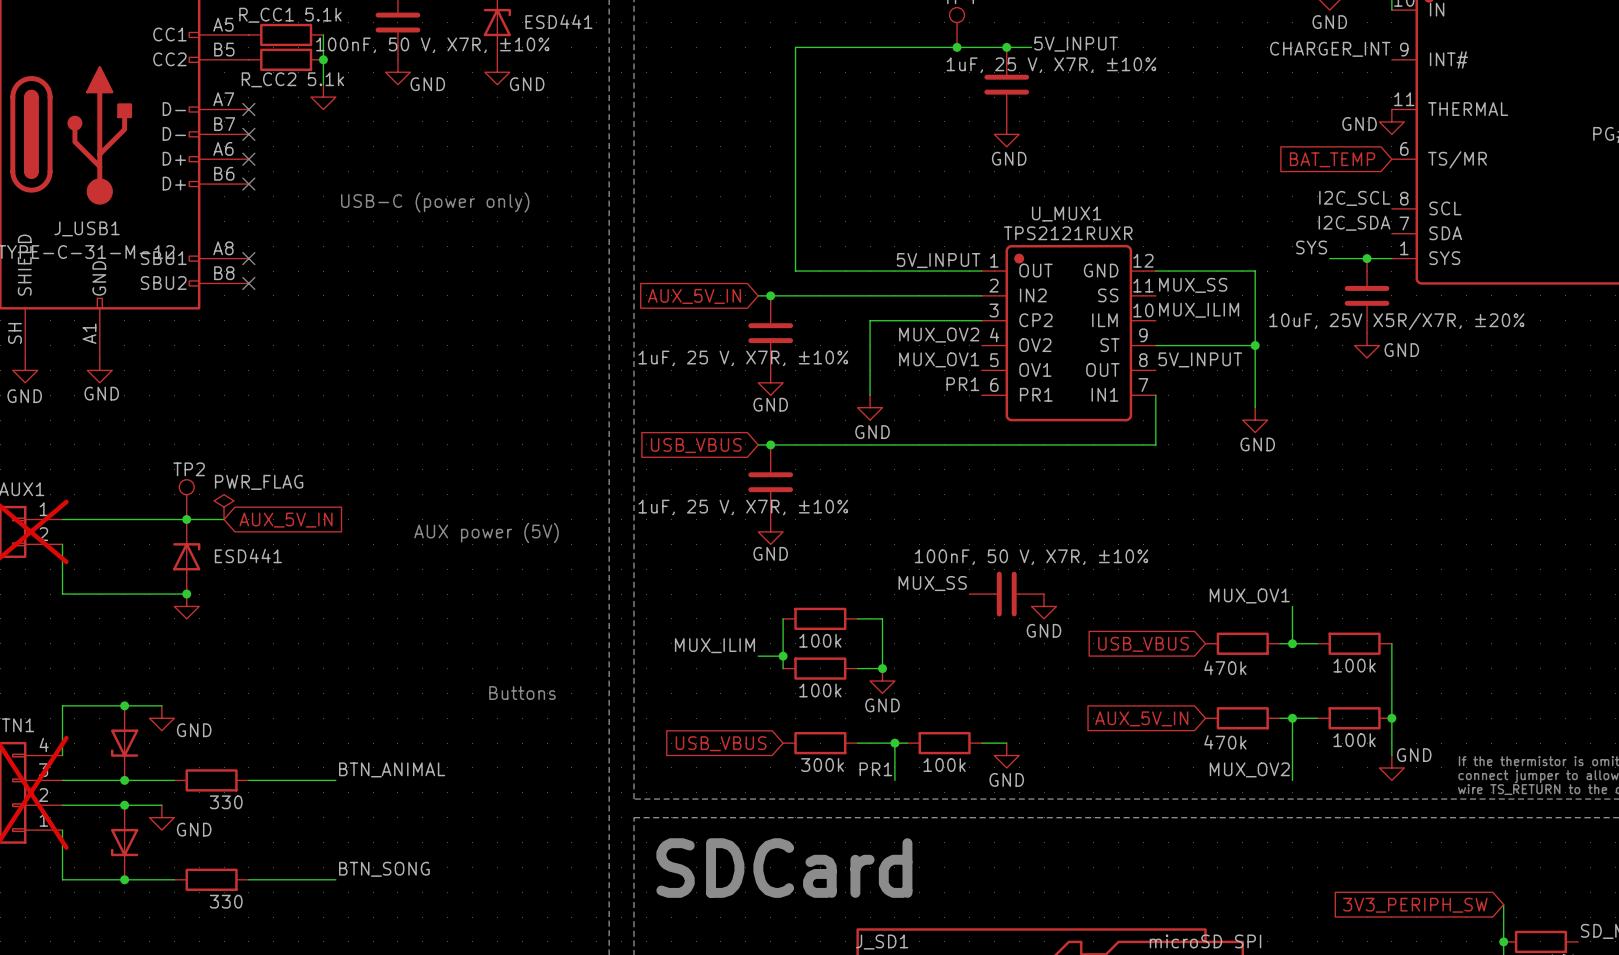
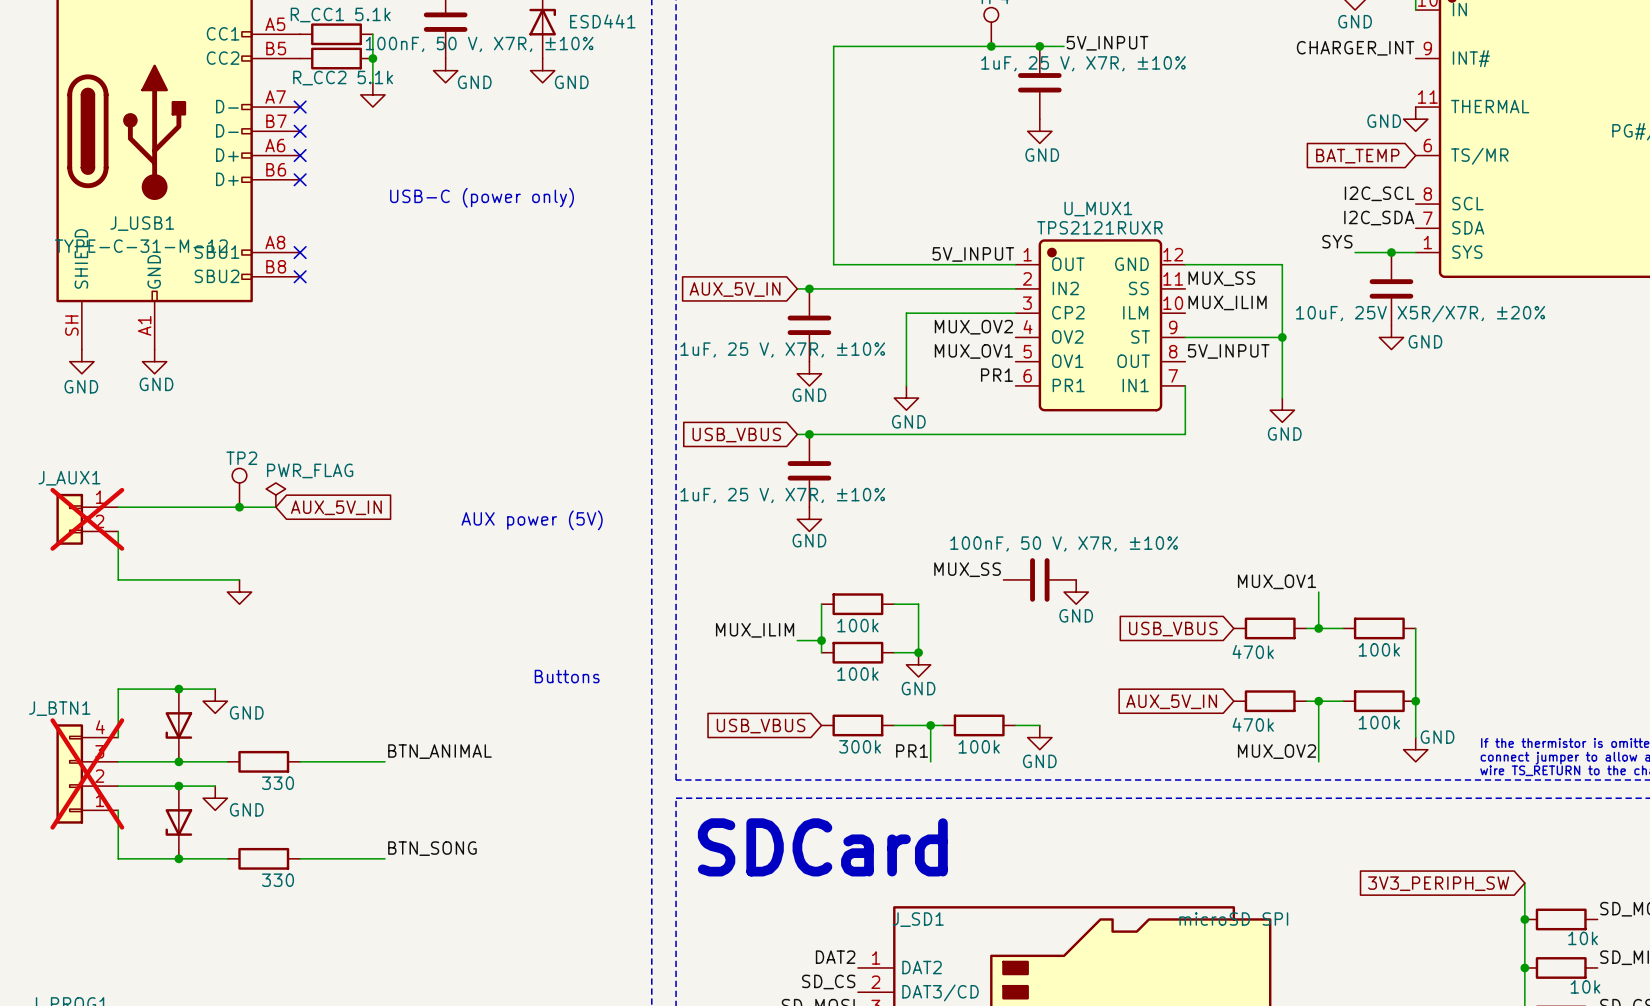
part: ESD441 (186, 556) -> none
junction: (186, 594) -> none

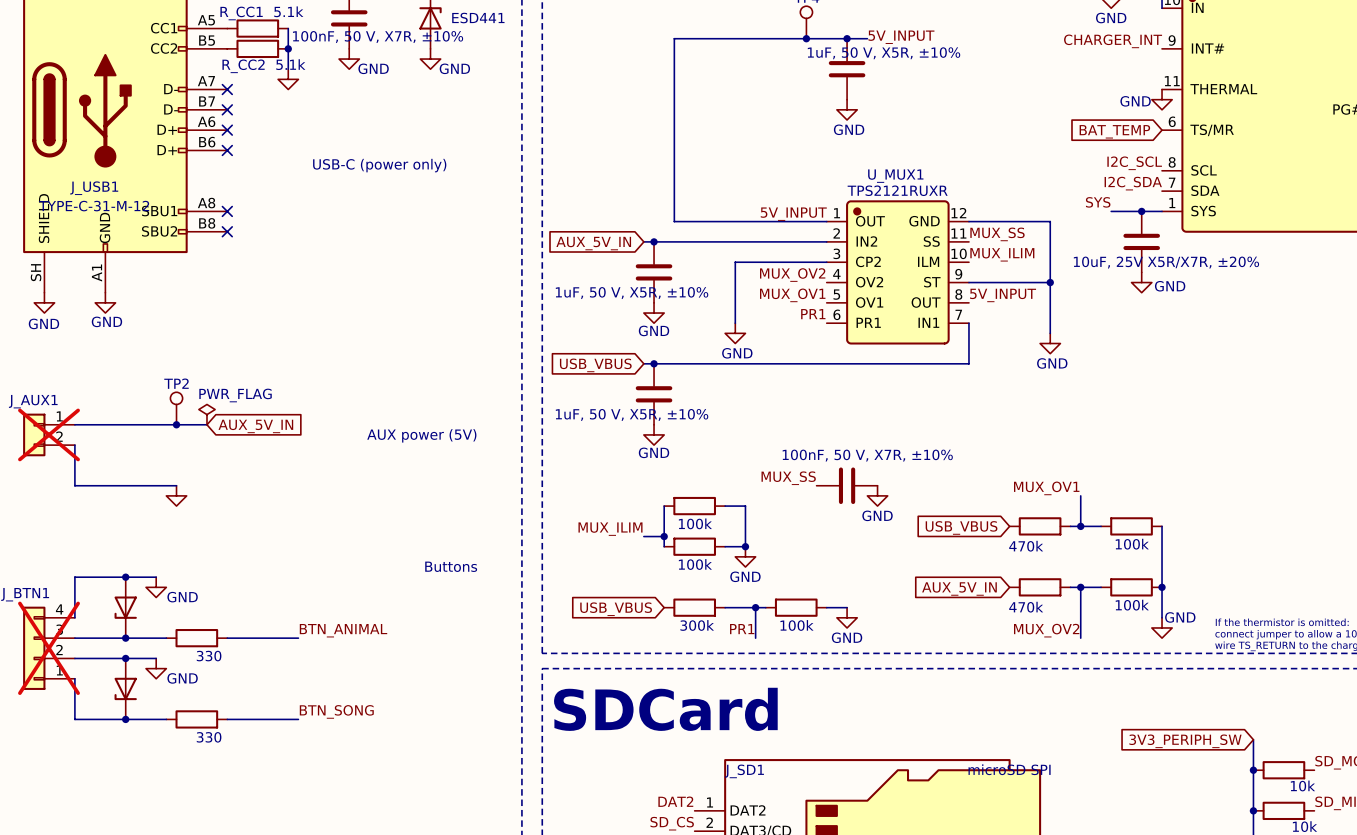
part value: 1uF, 25 V, X7R, ±10% (1083, 63) -> 1uF, 50 V, X5R, ±10% (884, 53)
part value: 1uF, 25 V, X7R, ±10% (782, 349) -> 1uF, 50 V, X5R, ±10% (632, 293)
part value: 1uF, 25 V, X7R, ±10% (782, 495) -> 1uF, 50 V, X5R, ±10% (632, 414)

